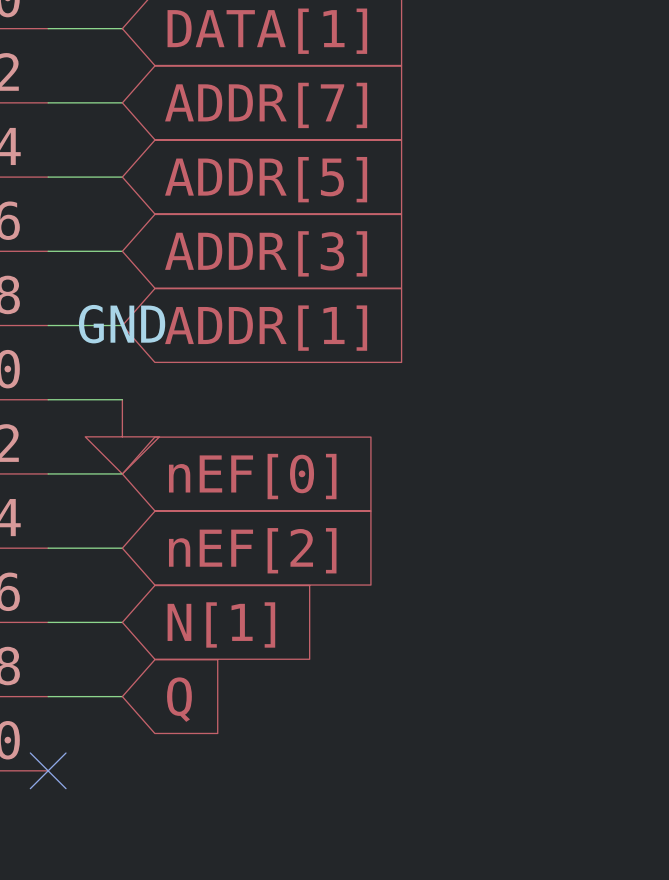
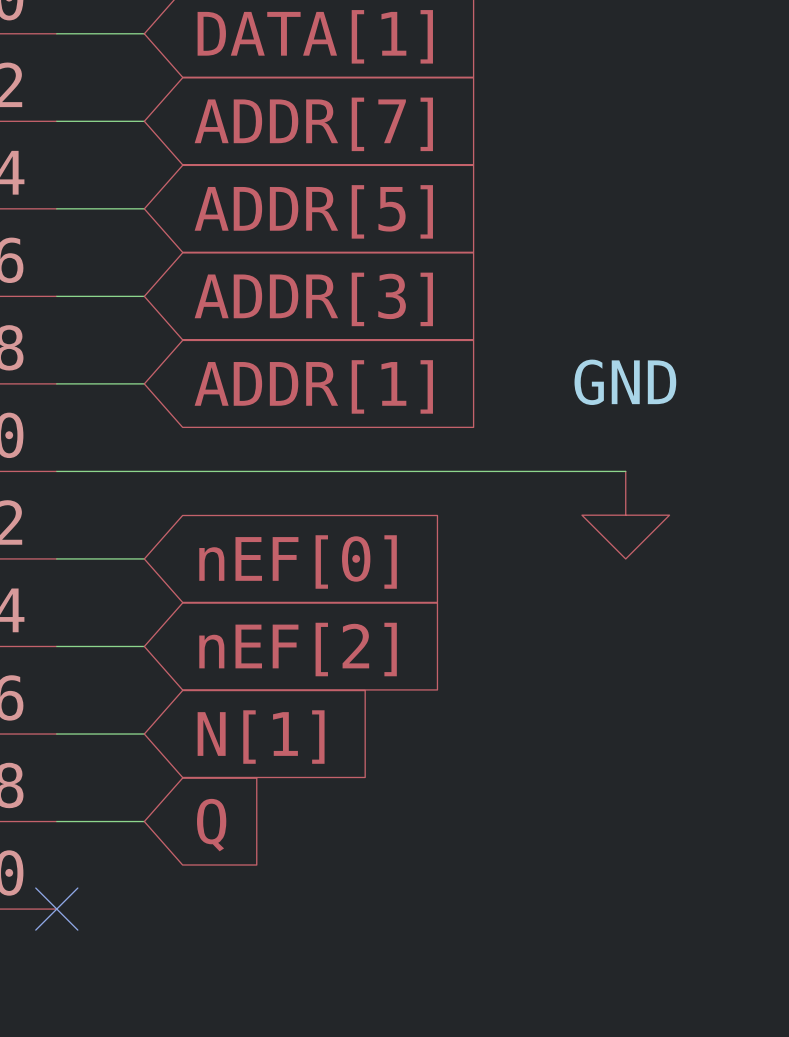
wire: none -> (144, 471) (625, 471)
power symbol position: GND (122, 436) -> GND (625, 515)

